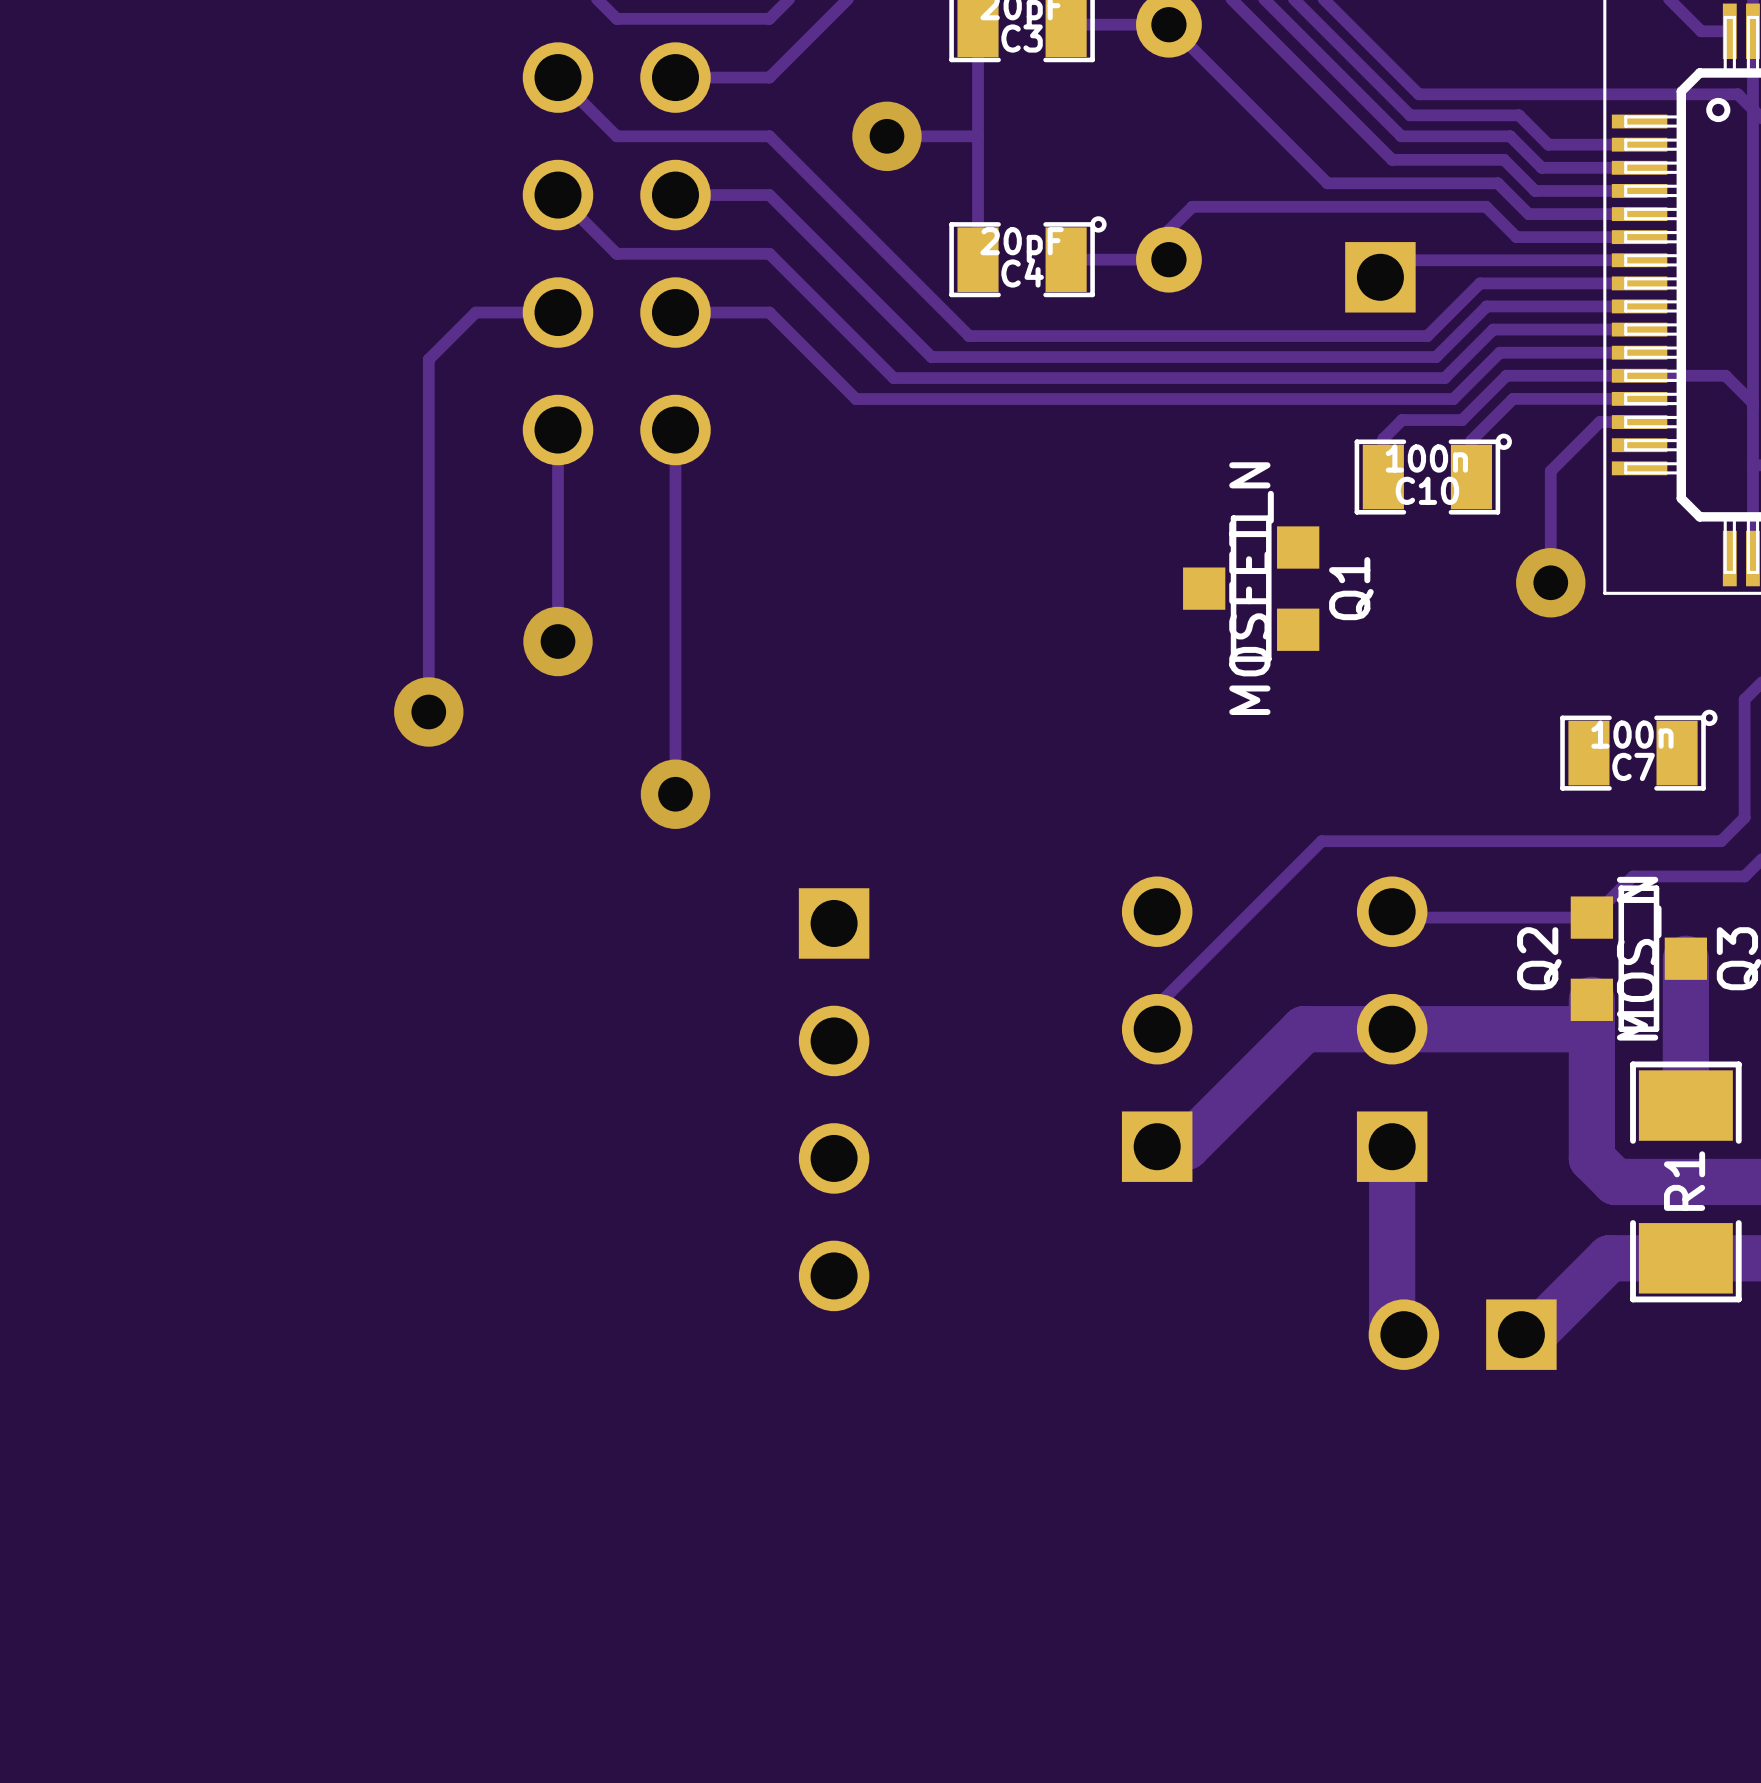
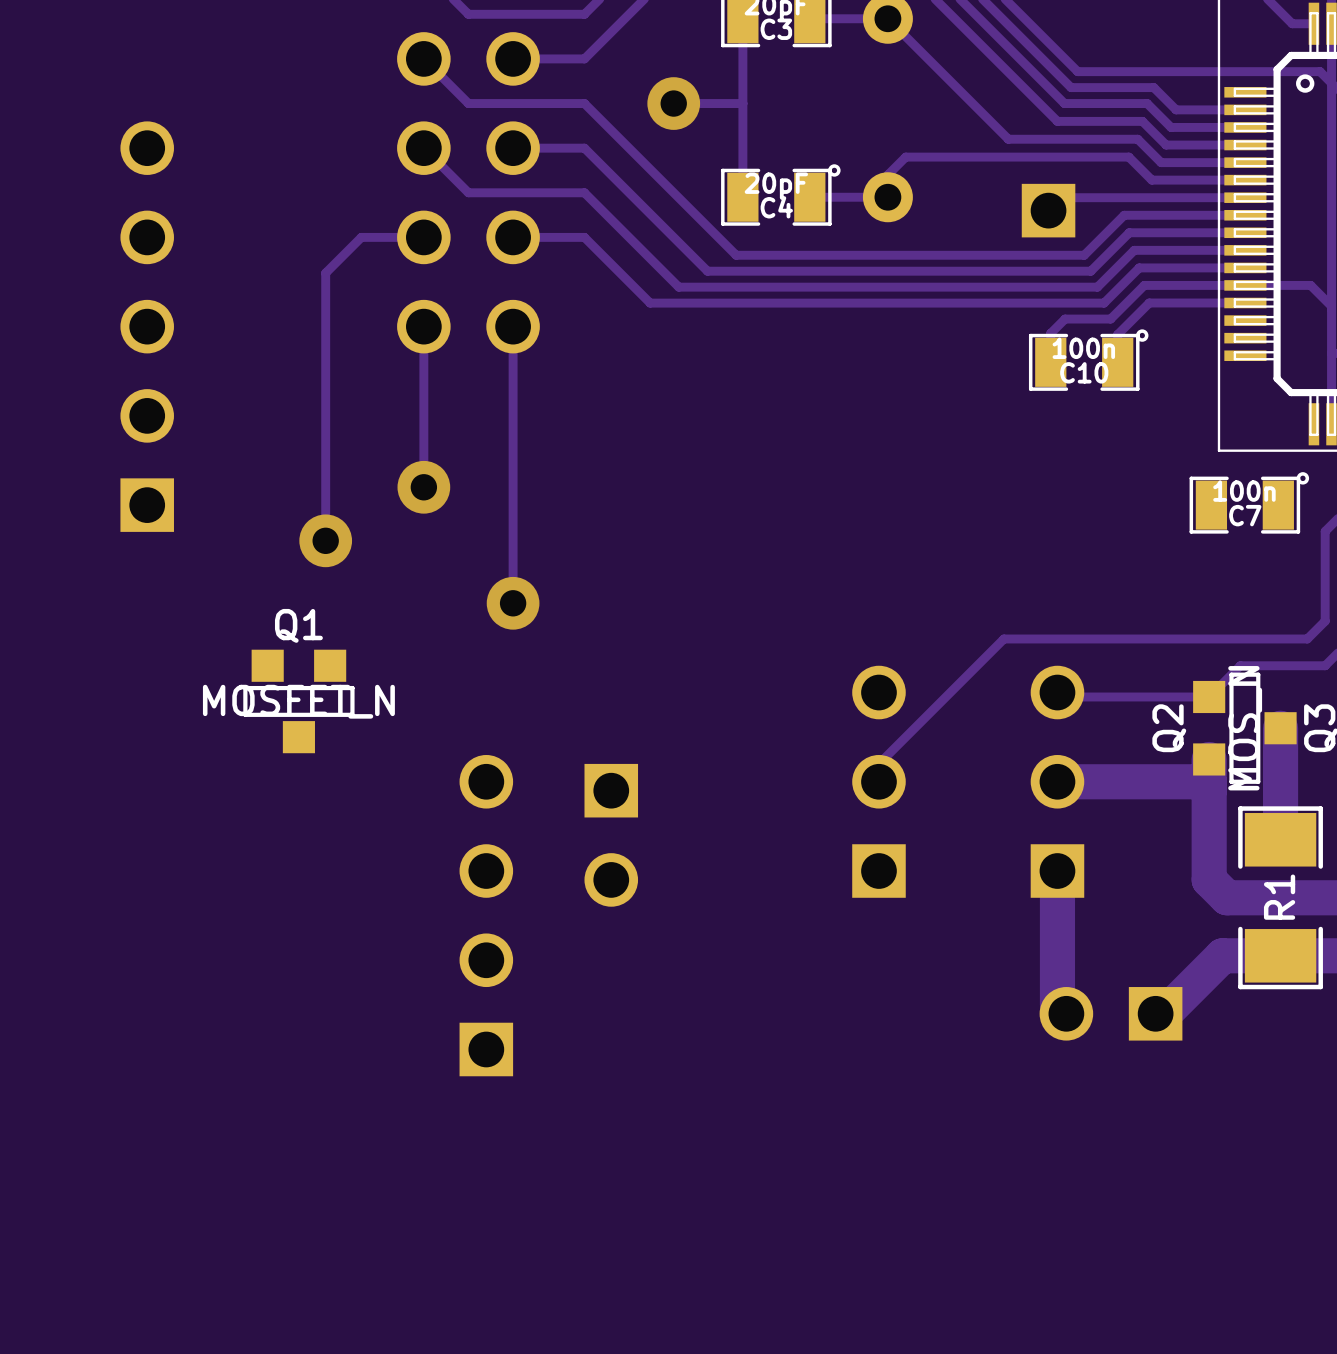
track: (1639, 422) (1599, 422) (1550, 471) (1550, 582) -> none
part: none -> (147, 326)
via: (1550, 582) -> none
Q1 rotation: 0° (1251, 588) -> 90° counterclockwise (298, 701)
Q1 position: (1251, 588) -> (298, 701)
C7 position: (1638, 750) -> (1249, 502)
part footprint: [798, 888, 870, 1312] -> [584, 763, 639, 907]
track: (1392, 1029) (1304, 1029) (1186, 1146) (1157, 1146) -> none
part: none -> (486, 915)

